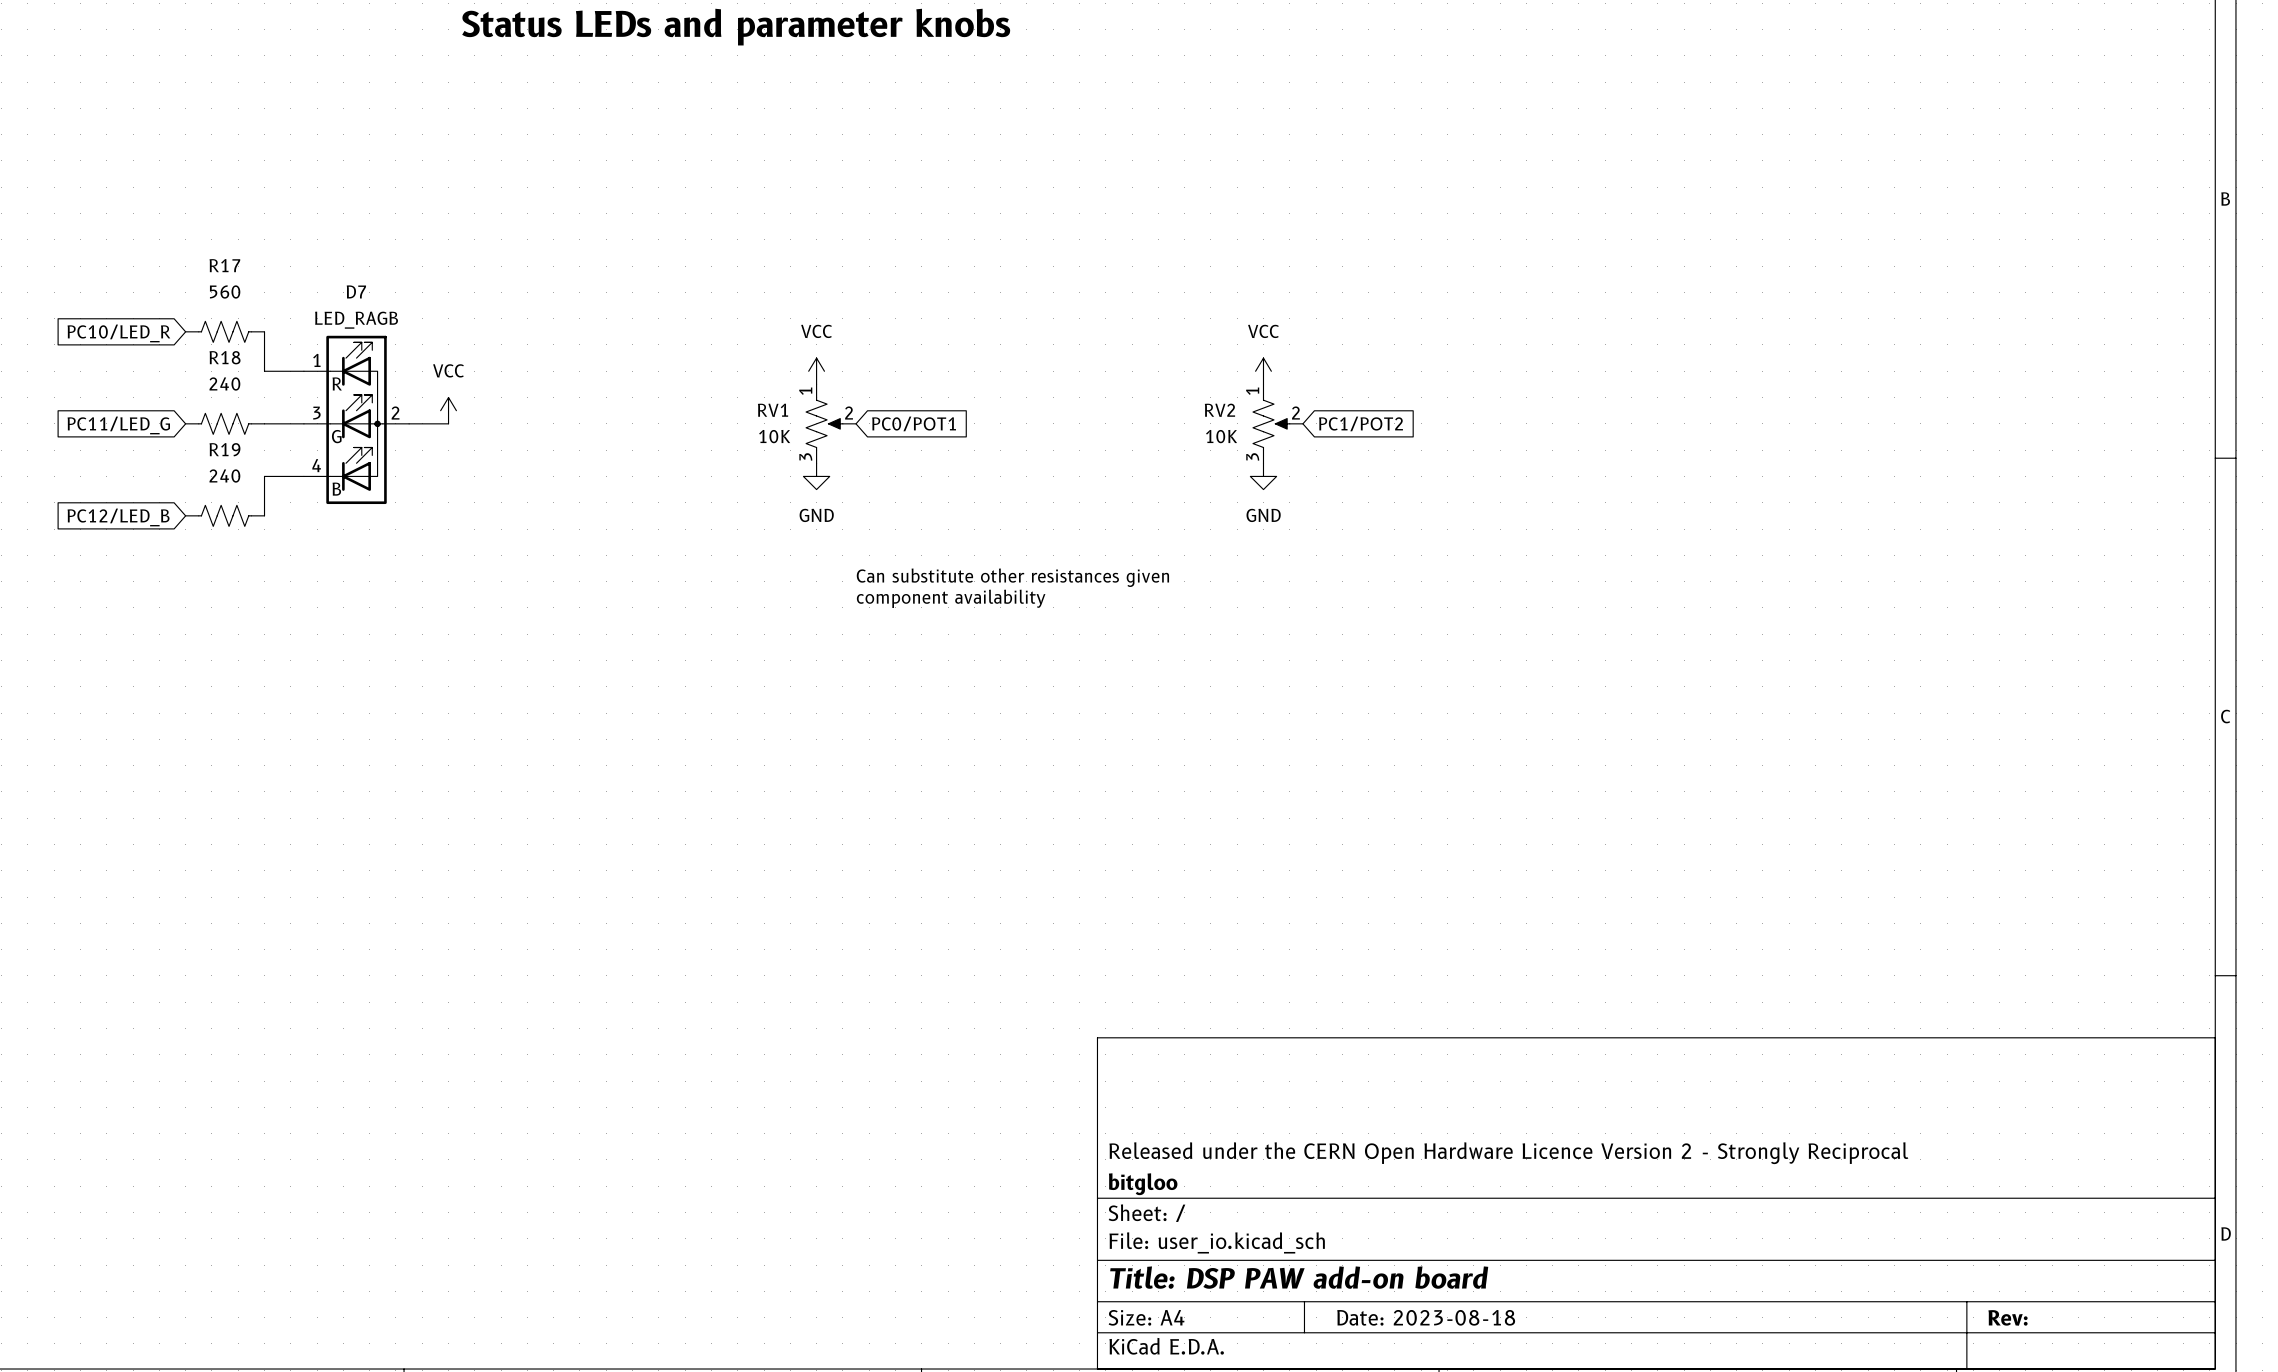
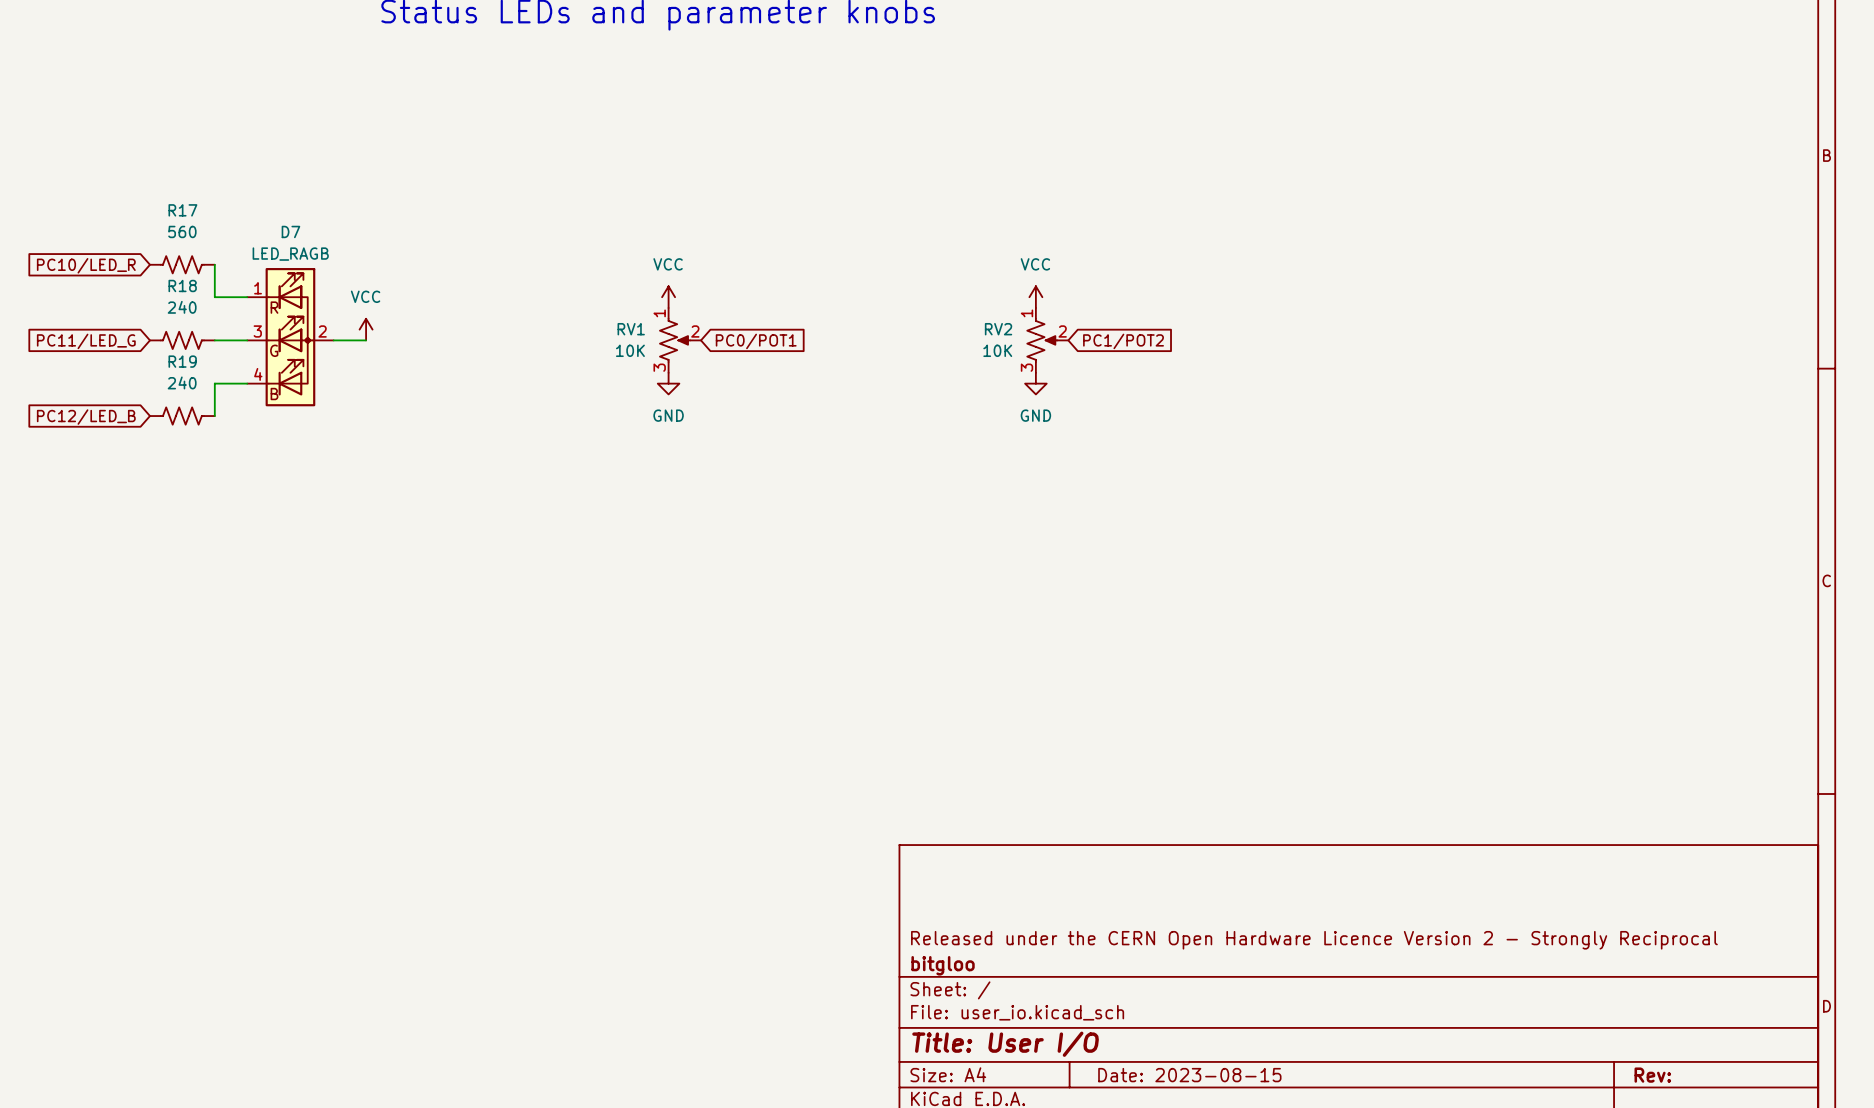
text: Can substitute other resistances given (1012, 577) -> none
text: component availability (951, 598) -> none
title block: Title: DSP PAW add-on board (1299, 1277) -> Title: User I/O (1005, 1044)
title block: Date: 2023-08-18 (1426, 1317) -> Date: 2023-08-15 (1189, 1075)

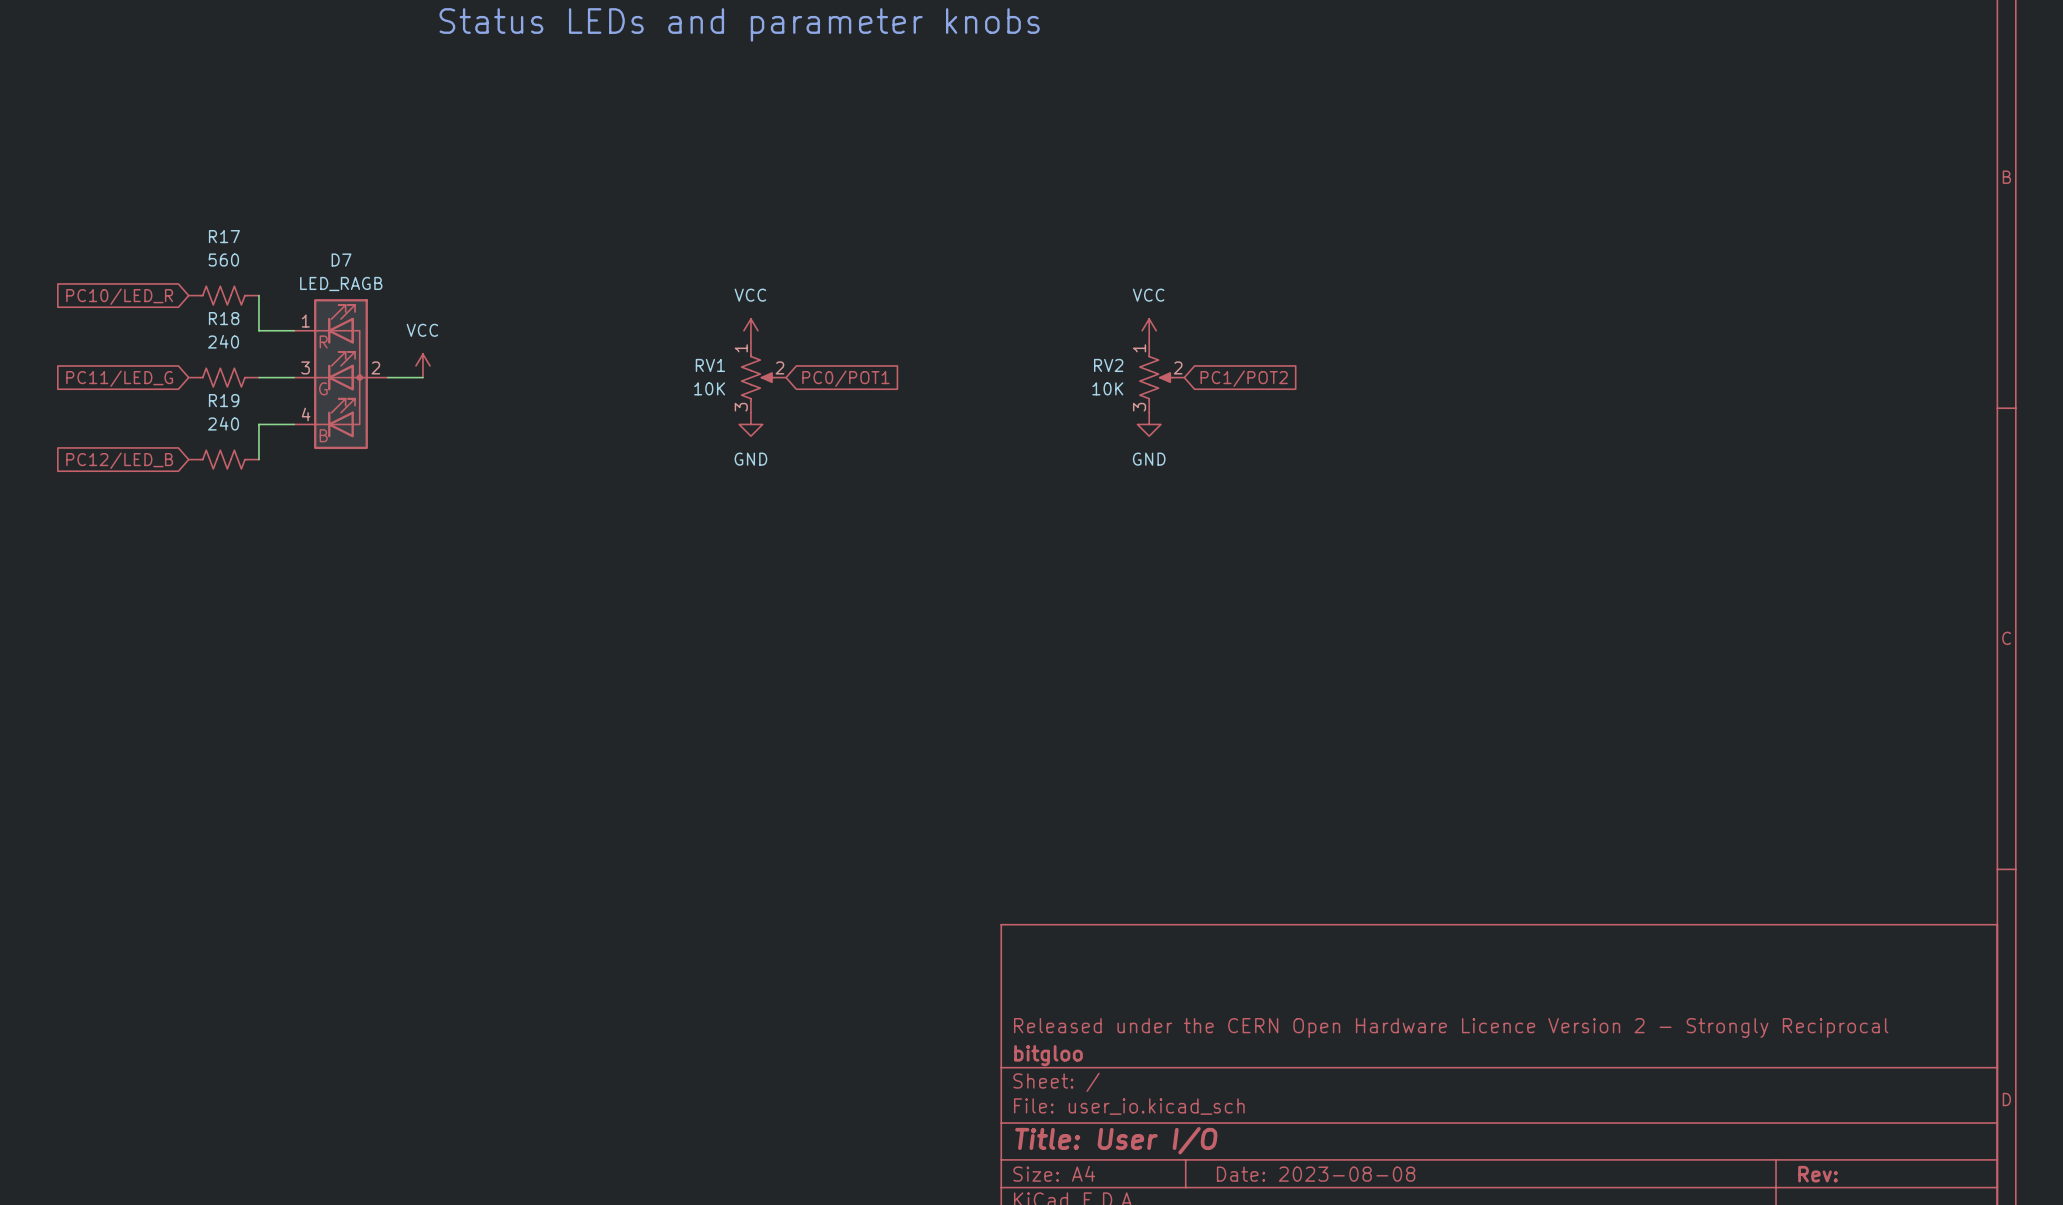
title block: Date: 2023-08-15 (1189, 1075) -> Date: 2023-08-08 (1316, 1174)

